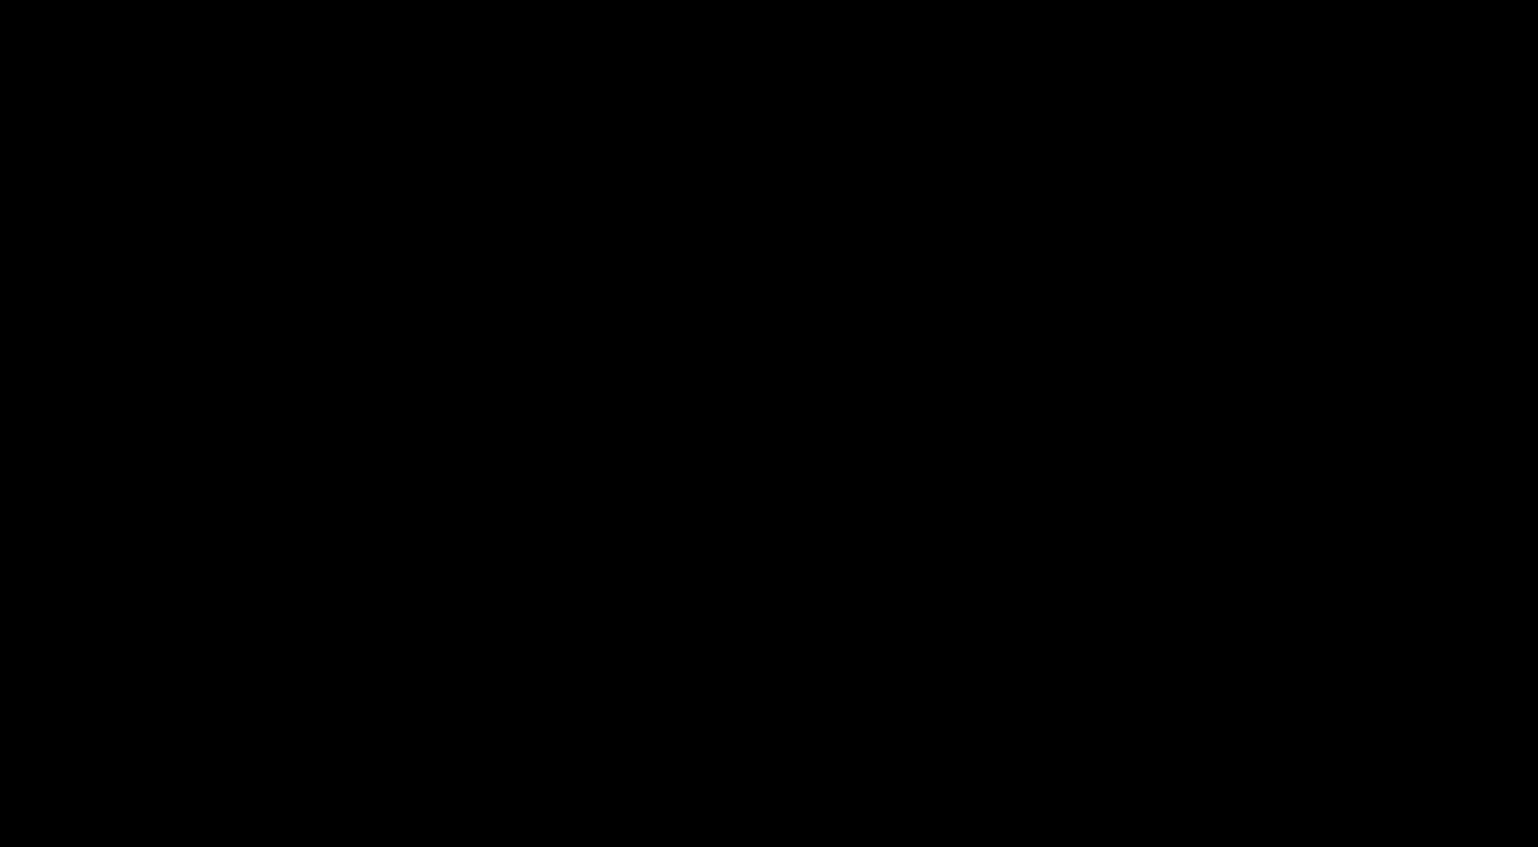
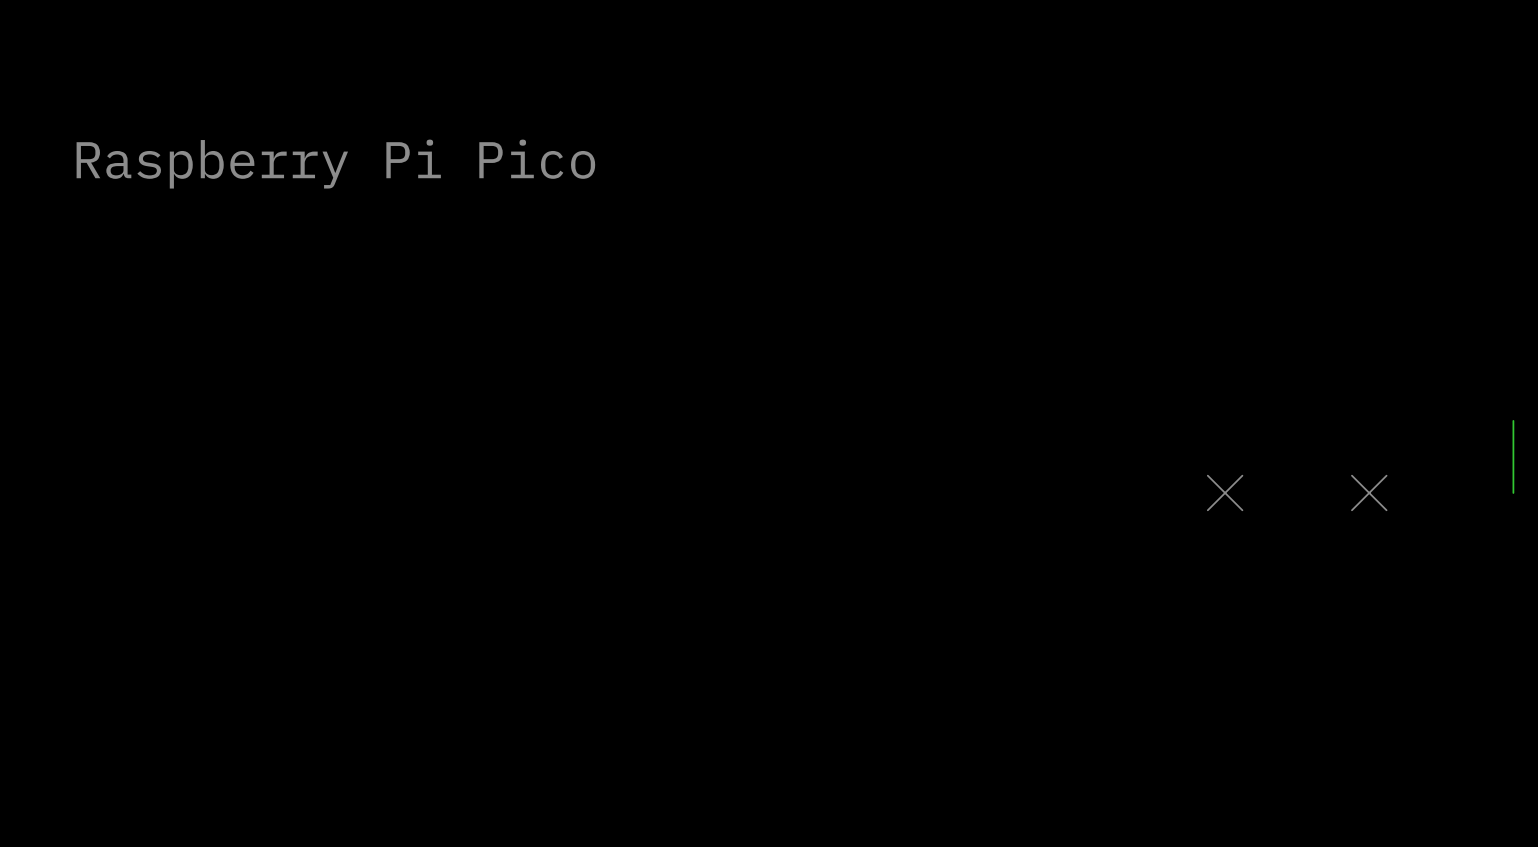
text: none -> Raspberry Pi Pico (335, 164)
wire: none -> (1513, 420) (1513, 492)
no-connect mark: none -> (1225, 492)
no-connect mark: none -> (1369, 492)

